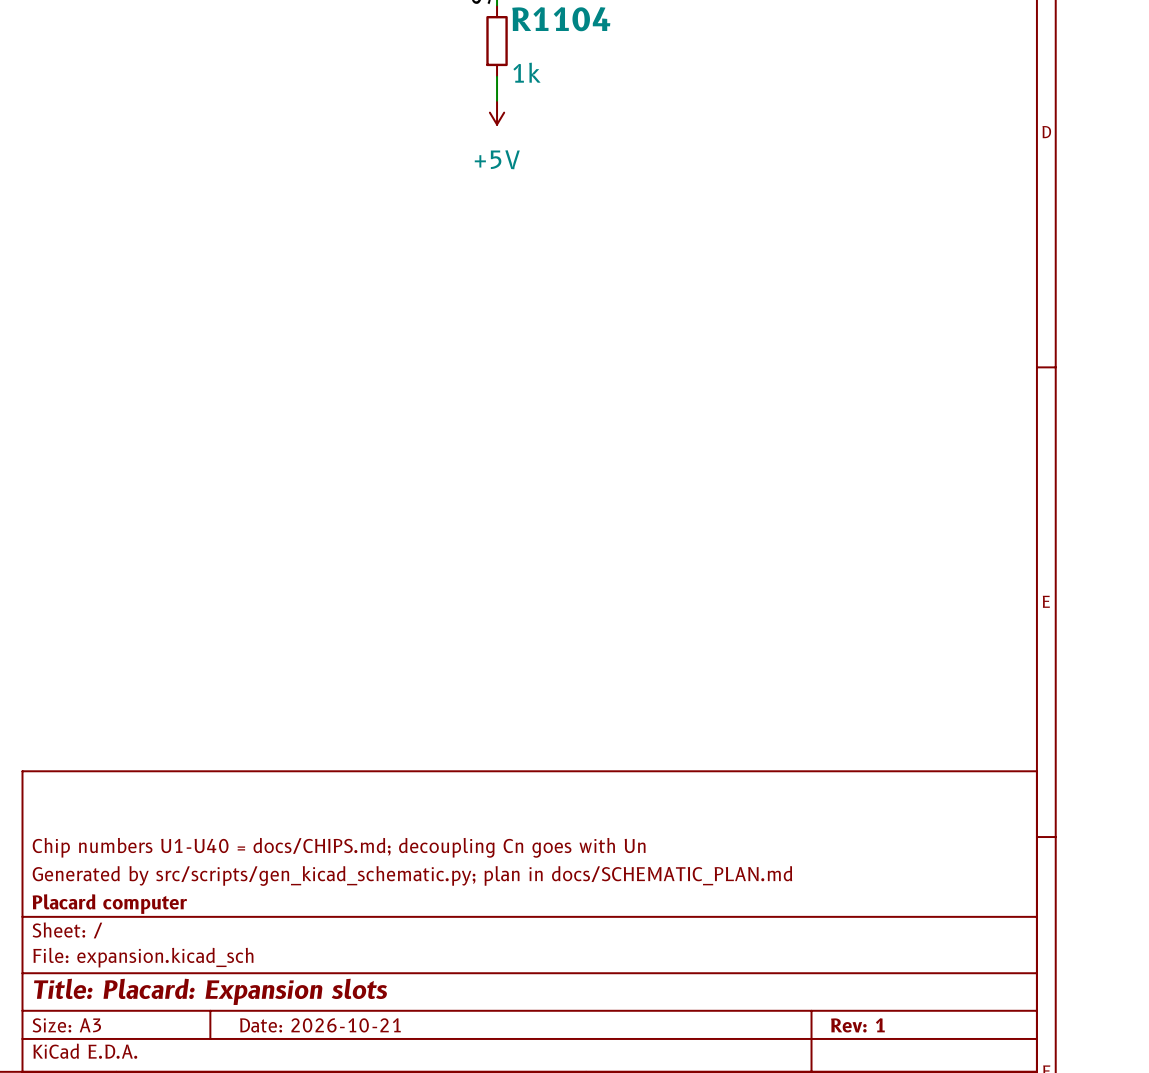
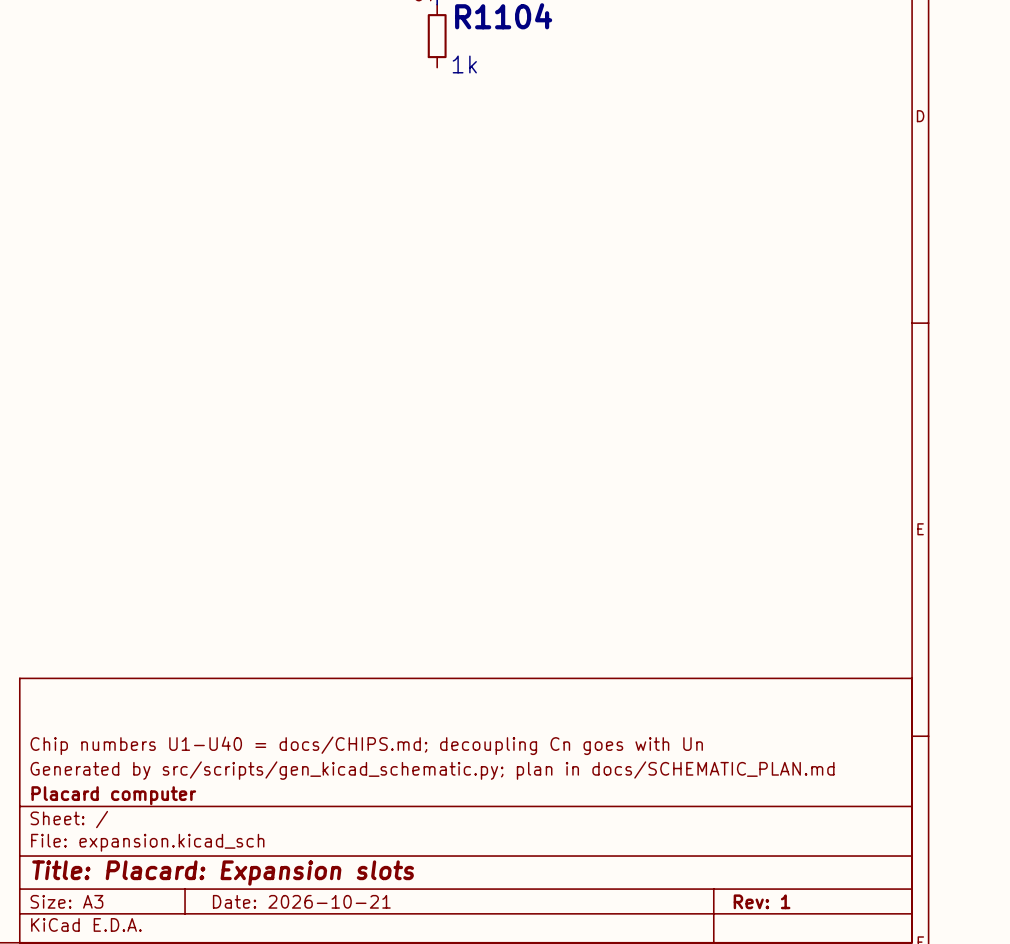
wire: (497, 76) (497, 100) -> none
power symbol: +5V (497, 112) -> none

